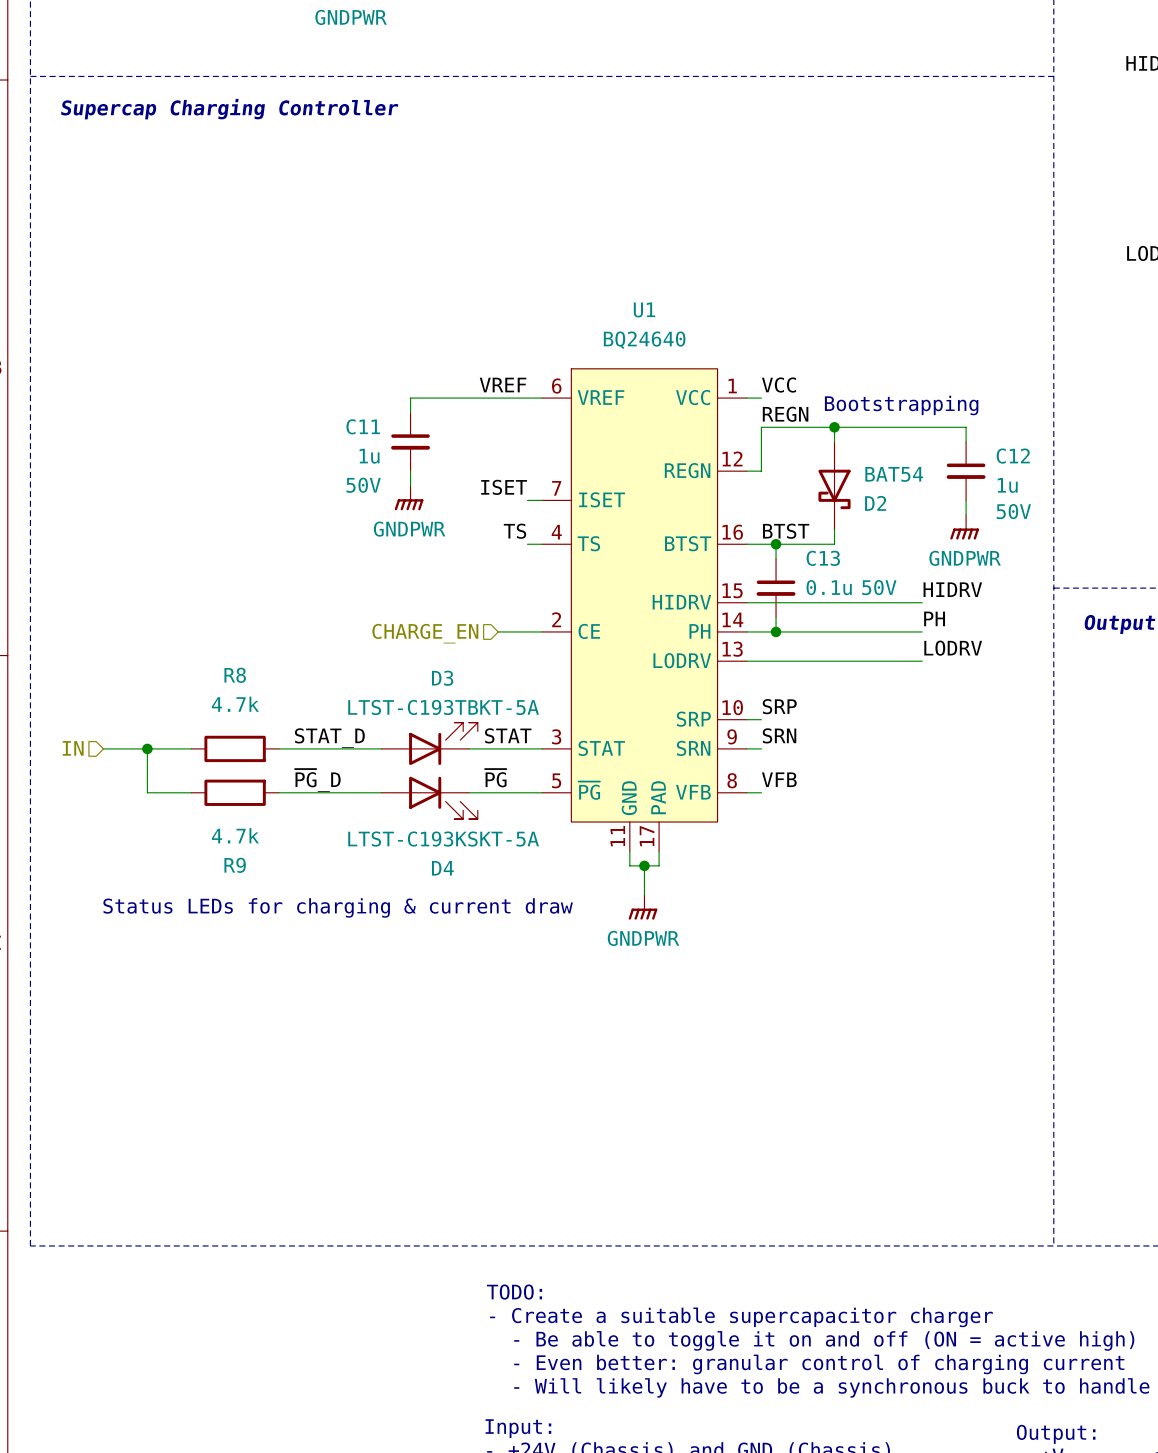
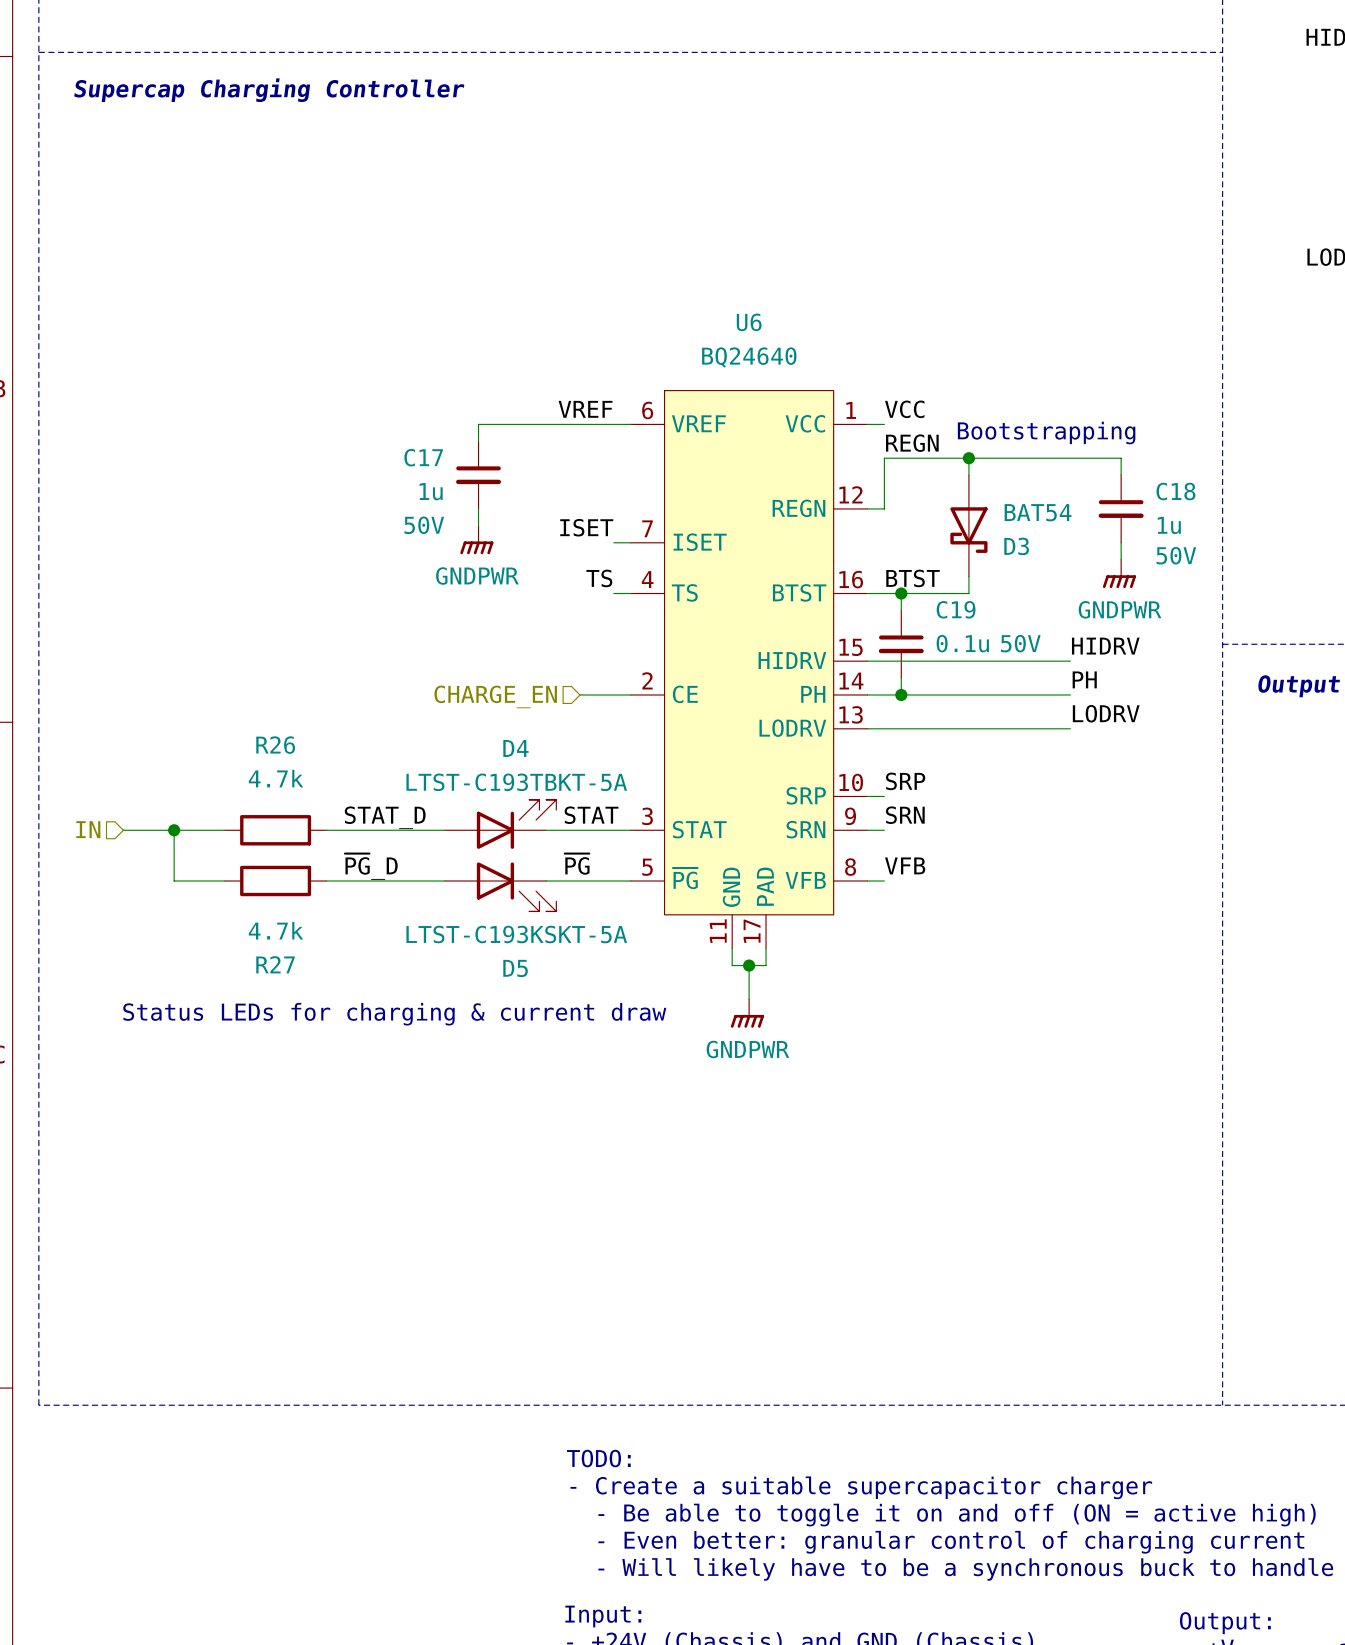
U1 name: U1 (644, 309) -> U6 (749, 322)
C11 name: C11 (363, 426) -> C17 (423, 457)
C12 name: C12 (1013, 456) -> C18 (1175, 491)
D2 name: D2 (875, 503) -> D3 (1016, 546)
C13 name: C13 (823, 558) -> C19 (956, 609)
R8 name: R8 (235, 675) -> R26 (275, 745)
D3 name: D3 (442, 678) -> D4 (515, 748)
R9 name: R9 (235, 865) -> R27 (275, 964)
D4 name: D4 (442, 868) -> D5 (515, 968)

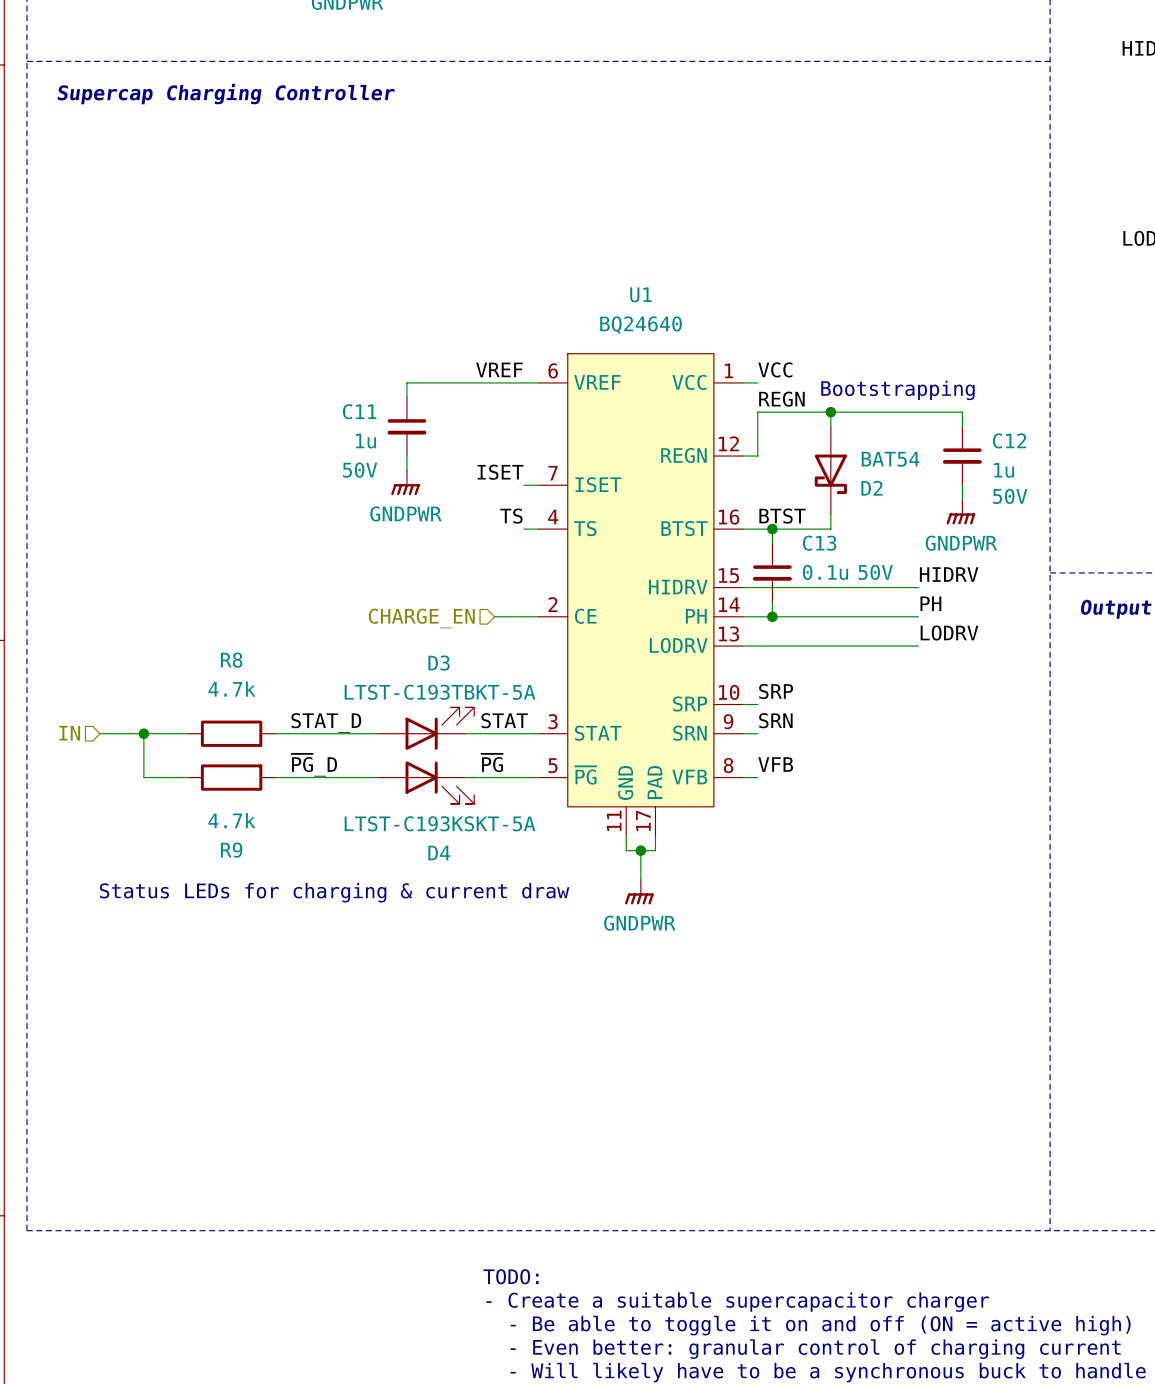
U6 name: U6 (749, 322) -> U1 (640, 294)
C17 name: C17 (423, 457) -> C11 (359, 411)
C18 name: C18 (1175, 491) -> C12 (1009, 440)
D3 name: D3 (1016, 546) -> D2 (871, 488)
C19 name: C19 (956, 609) -> C13 (819, 543)
R26 name: R26 (275, 745) -> R8 (231, 660)
D4 name: D4 (515, 748) -> D3 (439, 663)
R27 name: R27 (275, 964) -> R9 (231, 850)
D5 name: D5 (515, 968) -> D4 (439, 853)

